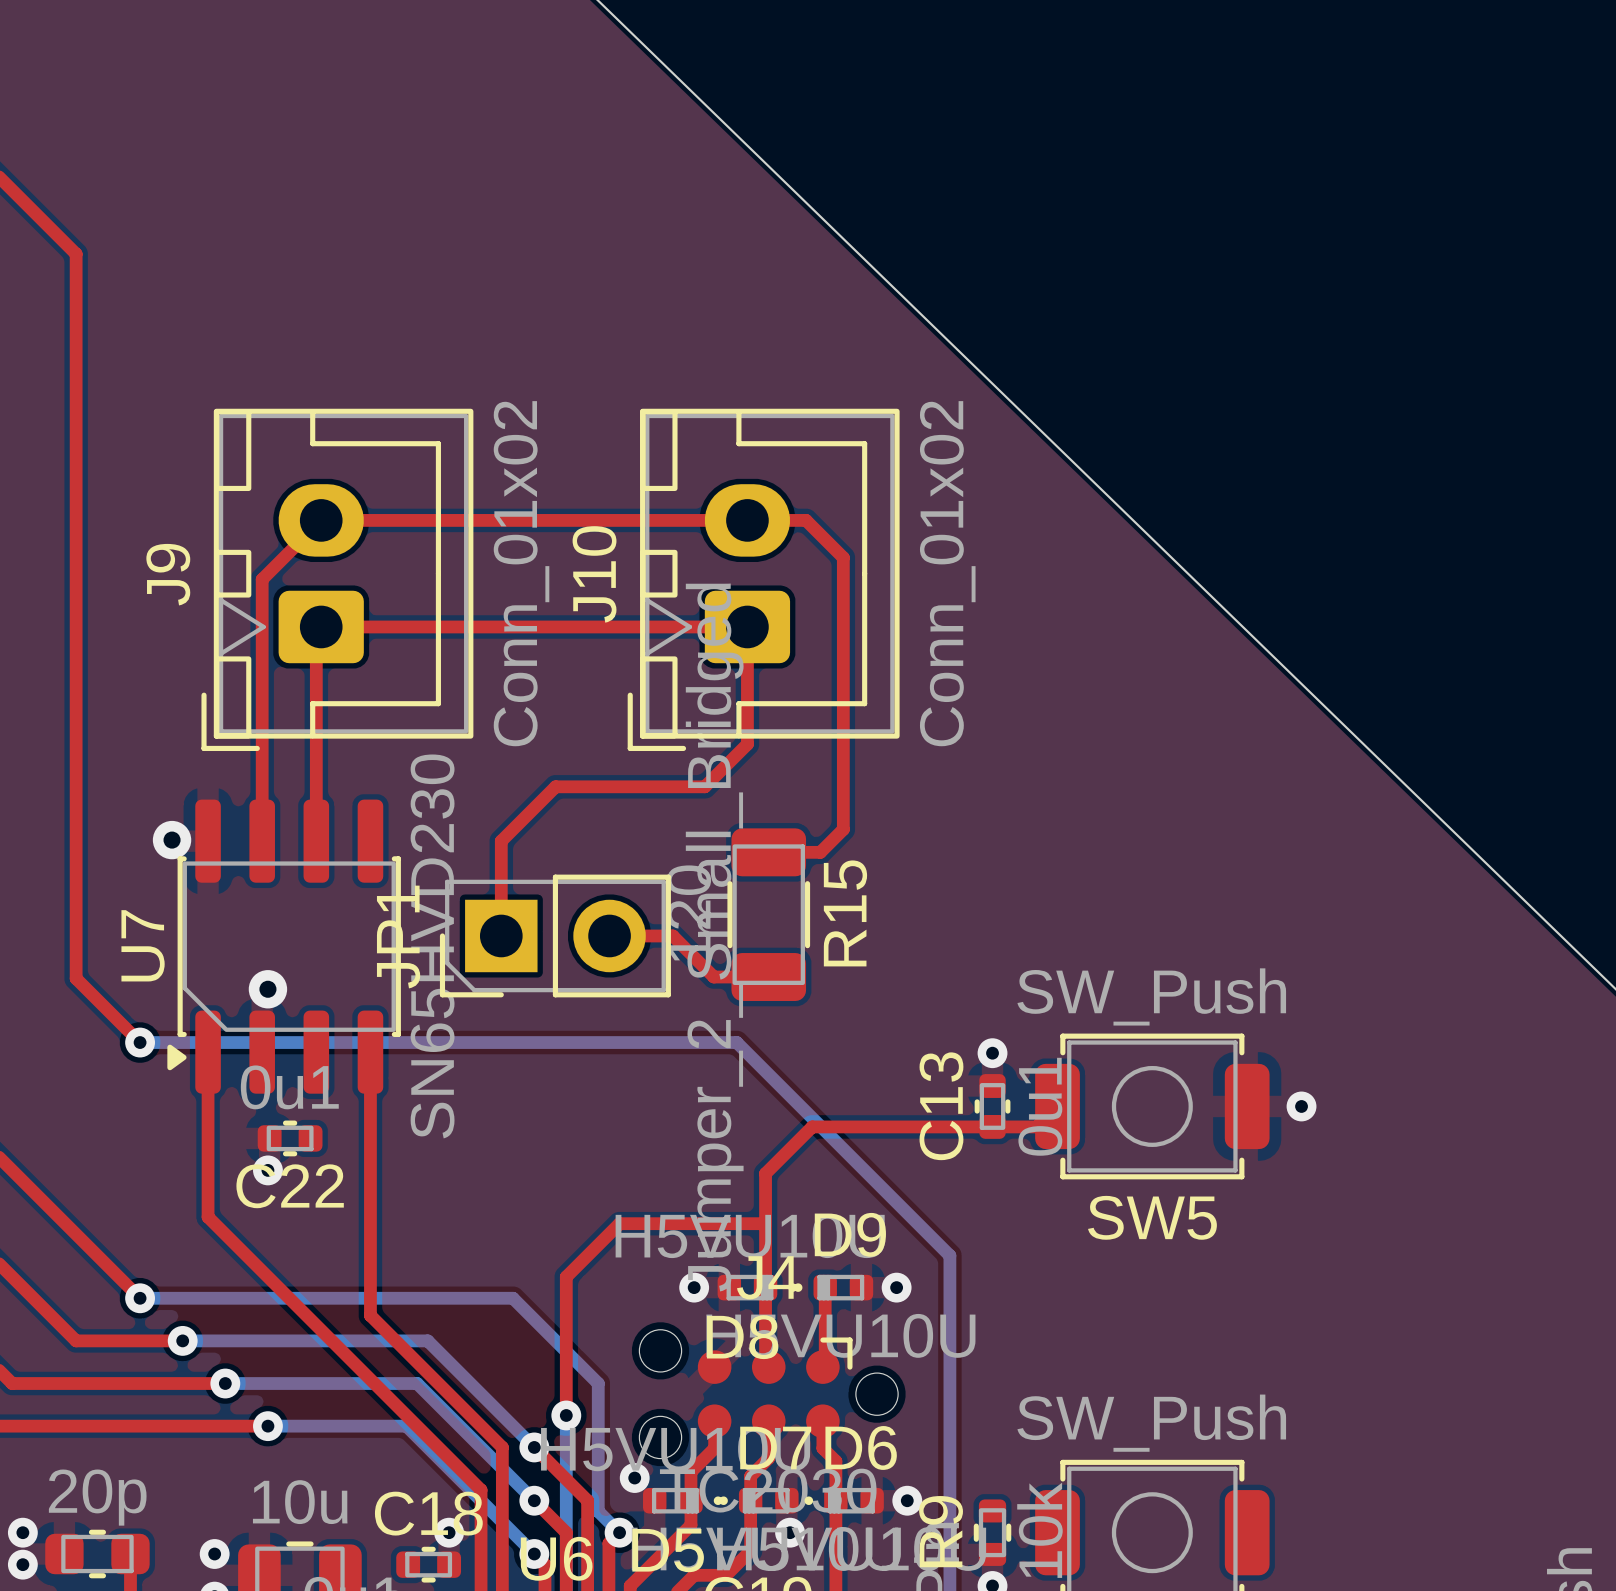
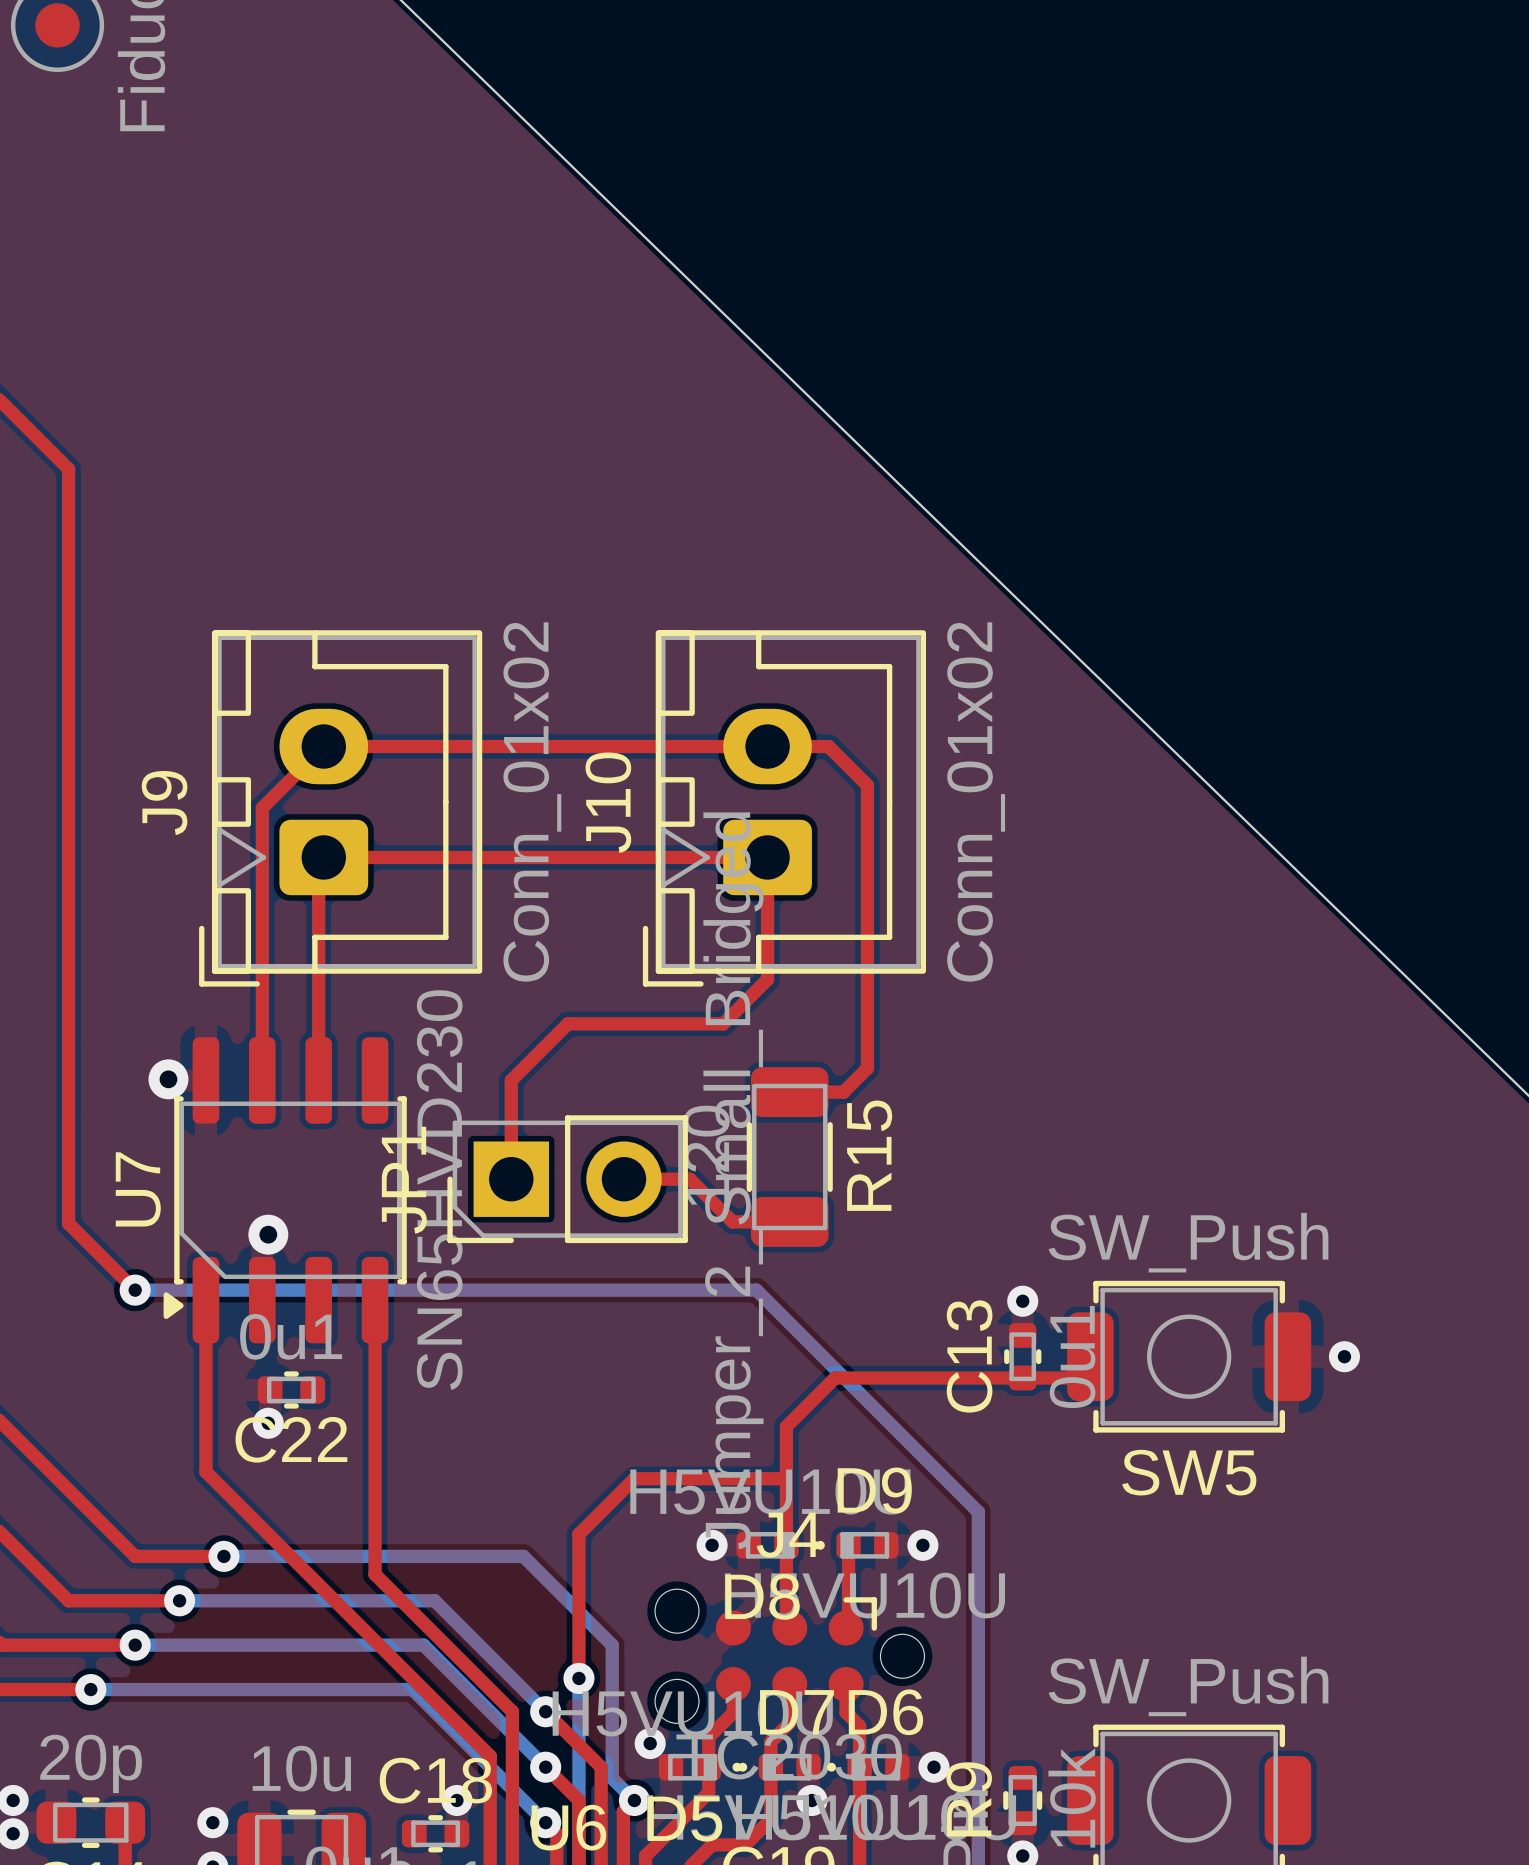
bottom track: (140, 1298) (225, 1298) -> (135, 1645) (223, 1645)
via: (140, 1298) -> none
via: none -> (223, 1556)
top track: (140, 1383) (225, 1383) -> (135, 1556) (223, 1556)
via: none -> (135, 1645)
via: (225, 1383) -> none
top track: (97, 1426) (267, 1426) -> none
bottom track: none -> (90, 1689) (268, 1689)
via: none -> (90, 1689)
via: (267, 1426) -> none

